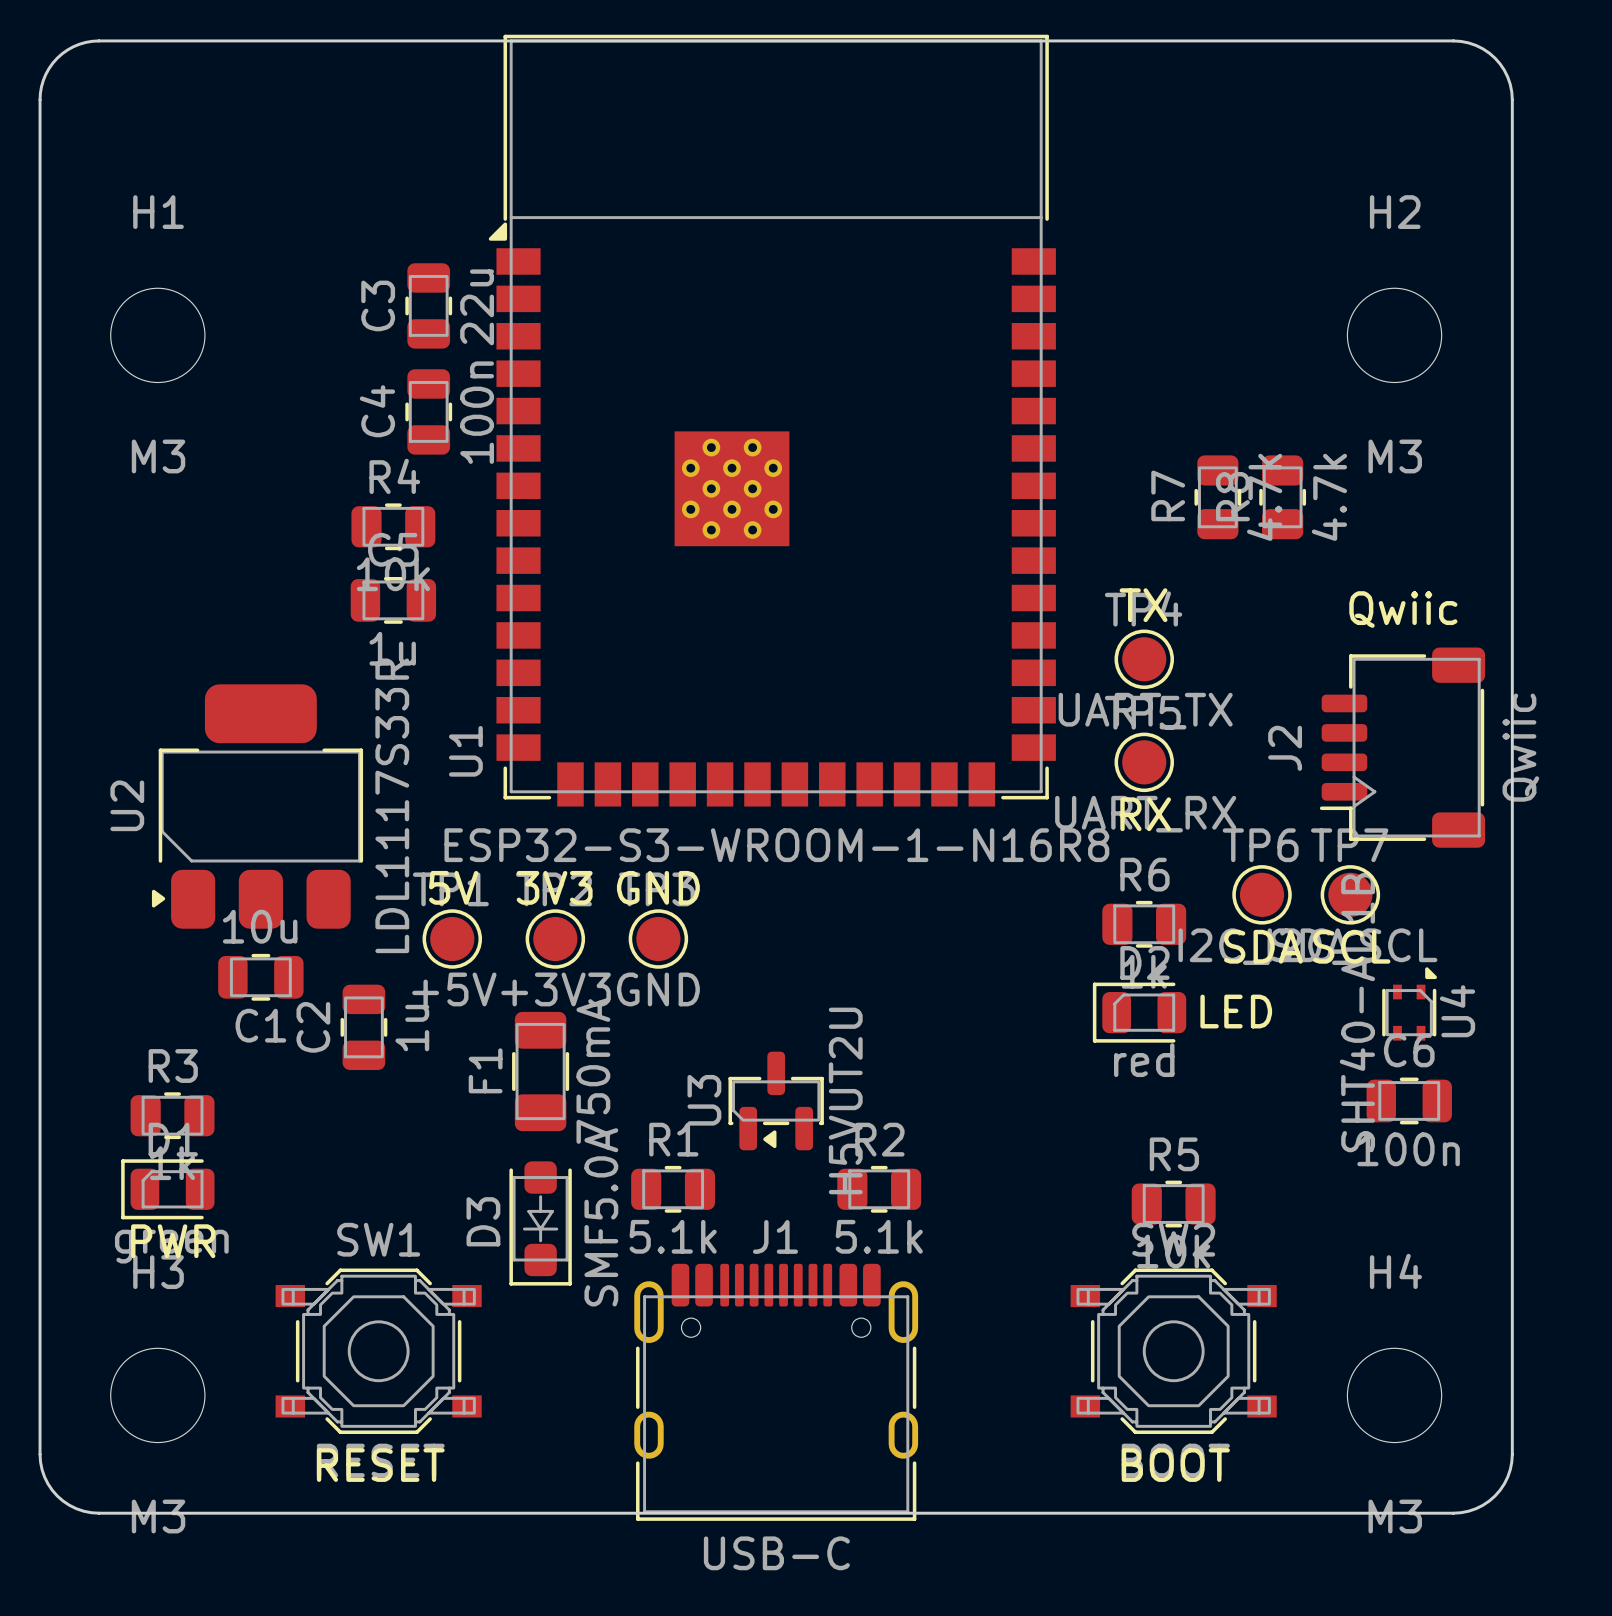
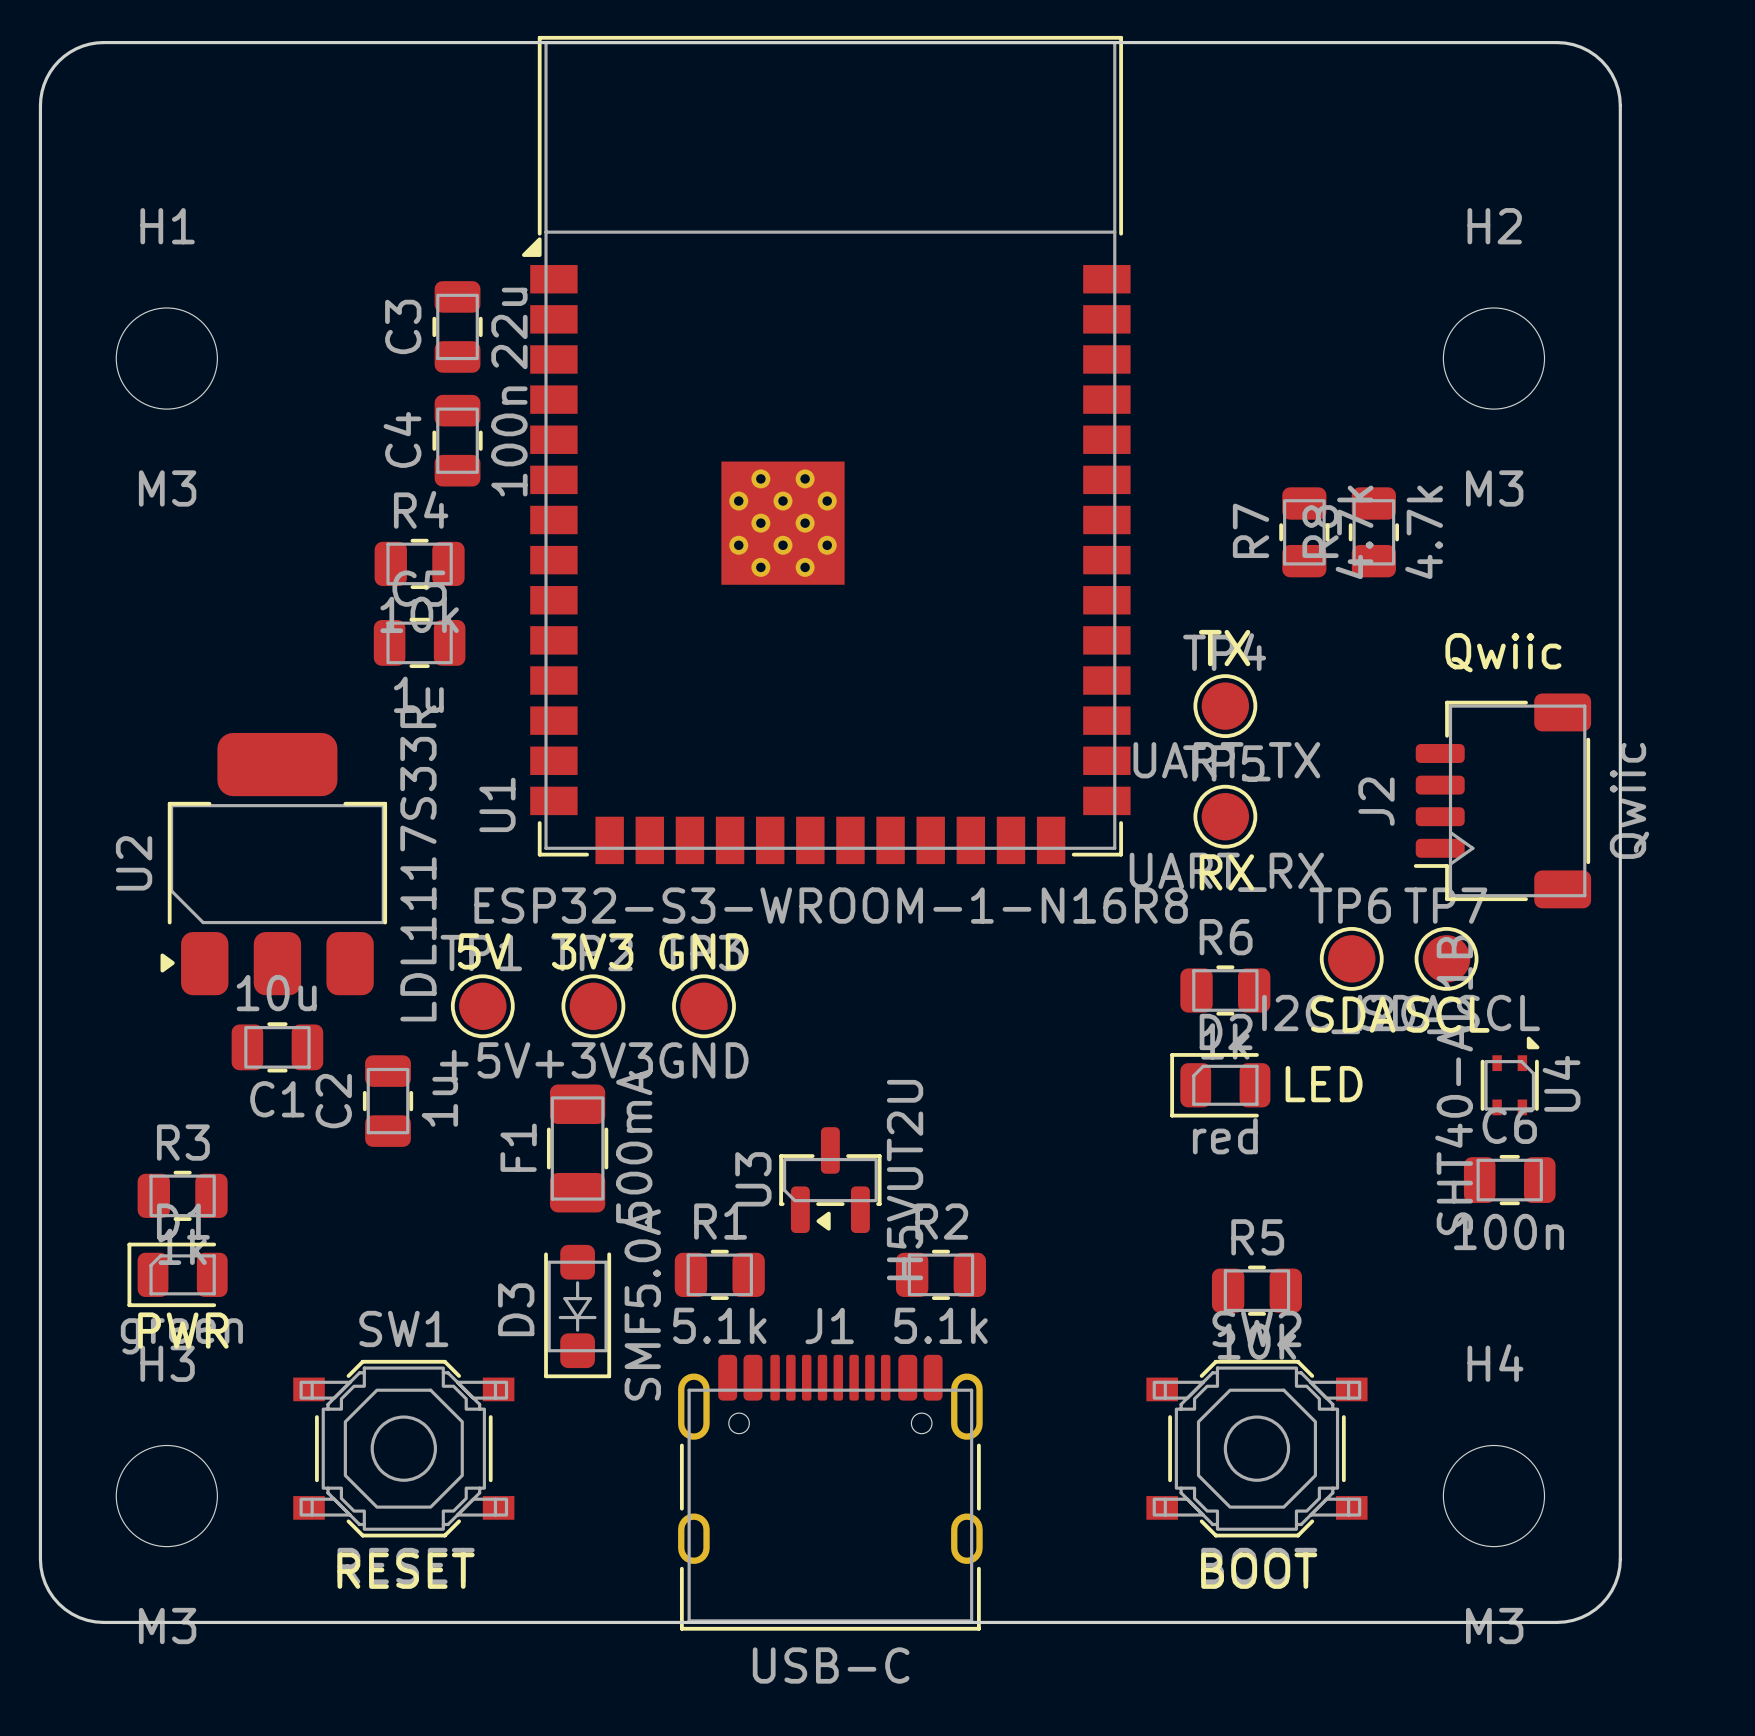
F1 value: 750mA (593, 1070) -> 500mA (634, 1146)

